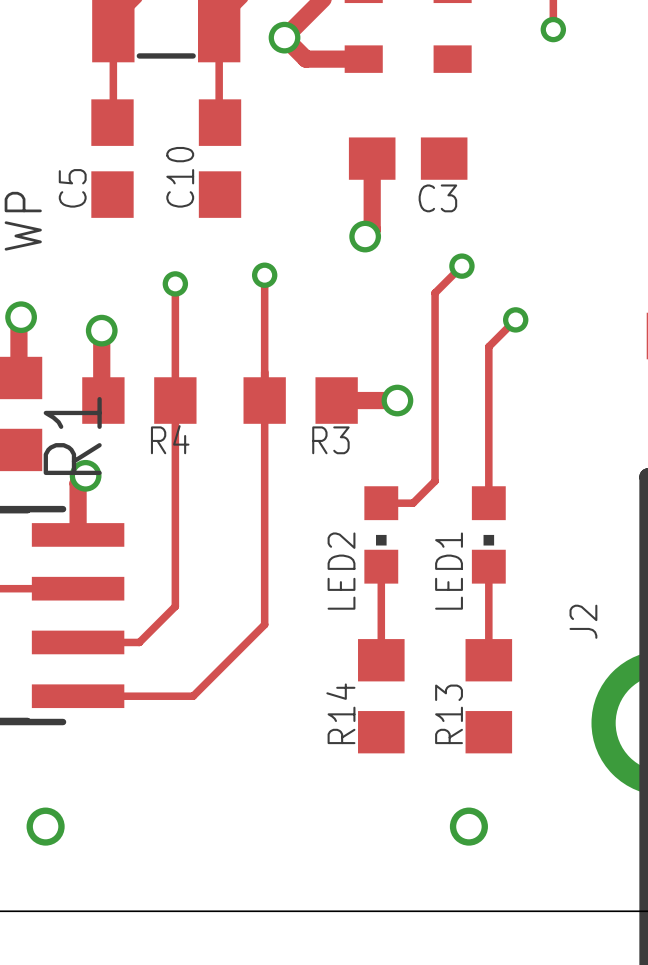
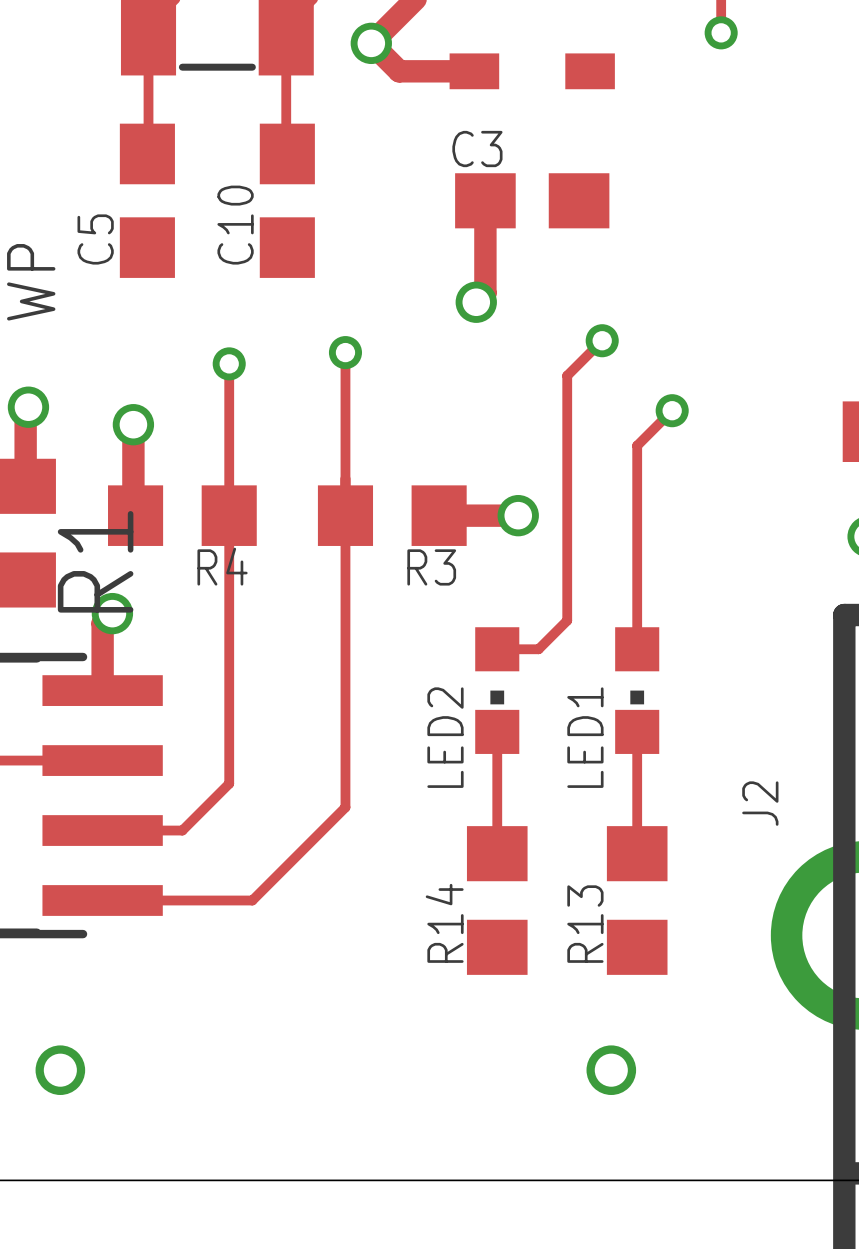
C3 name position: C3 (437, 198) -> C3 (477, 149)

